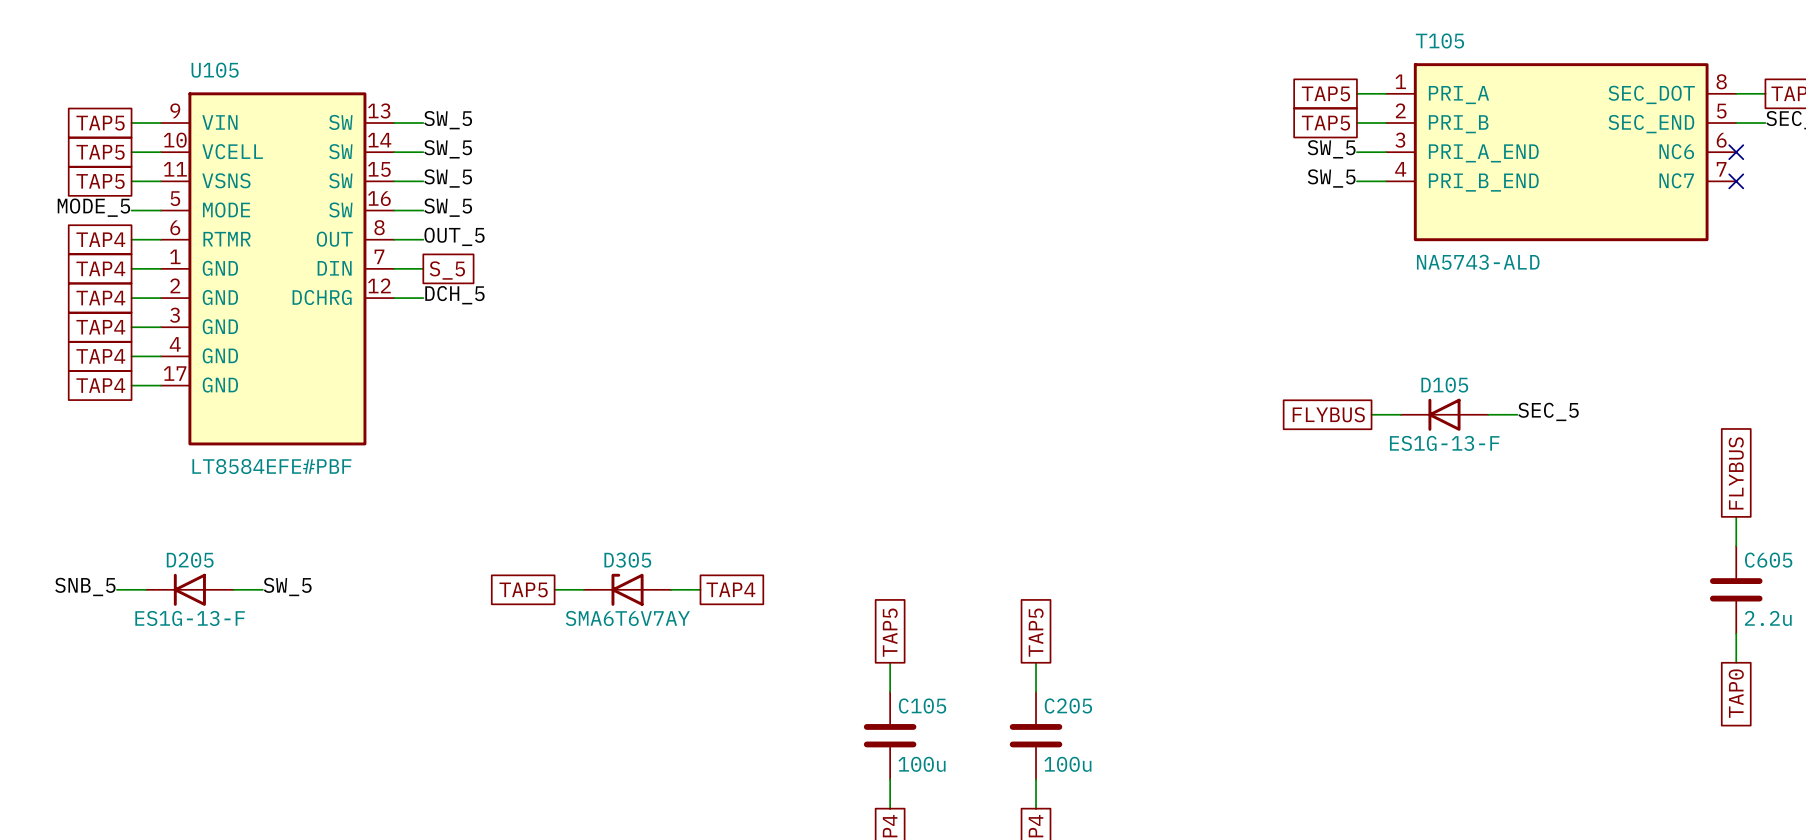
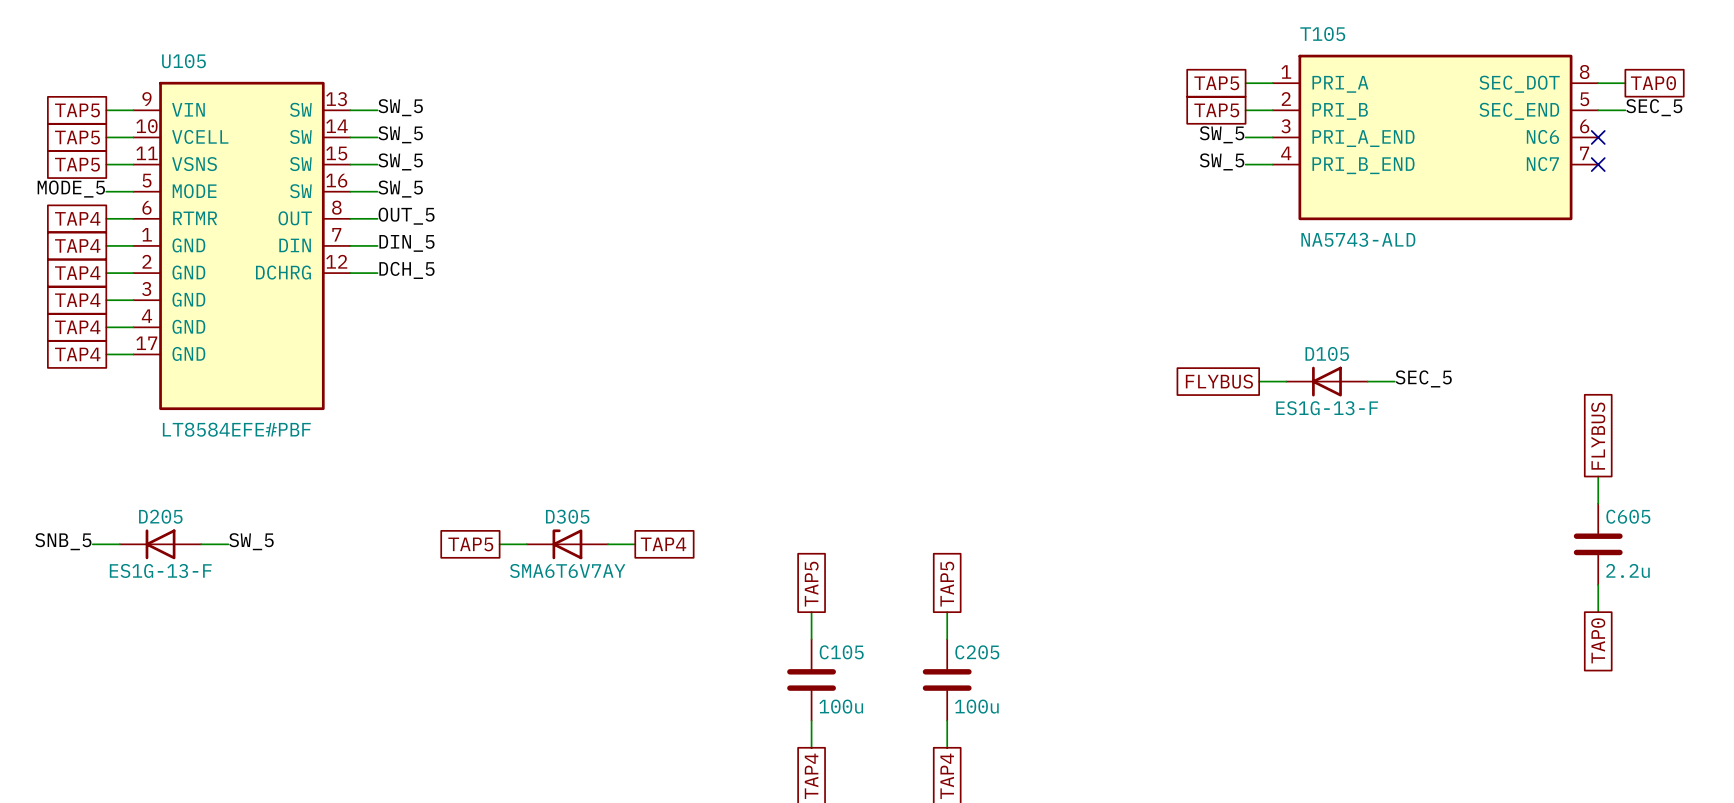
label: none -> DIN_5 (406, 243)
global label: S_5 (447, 270) -> none

